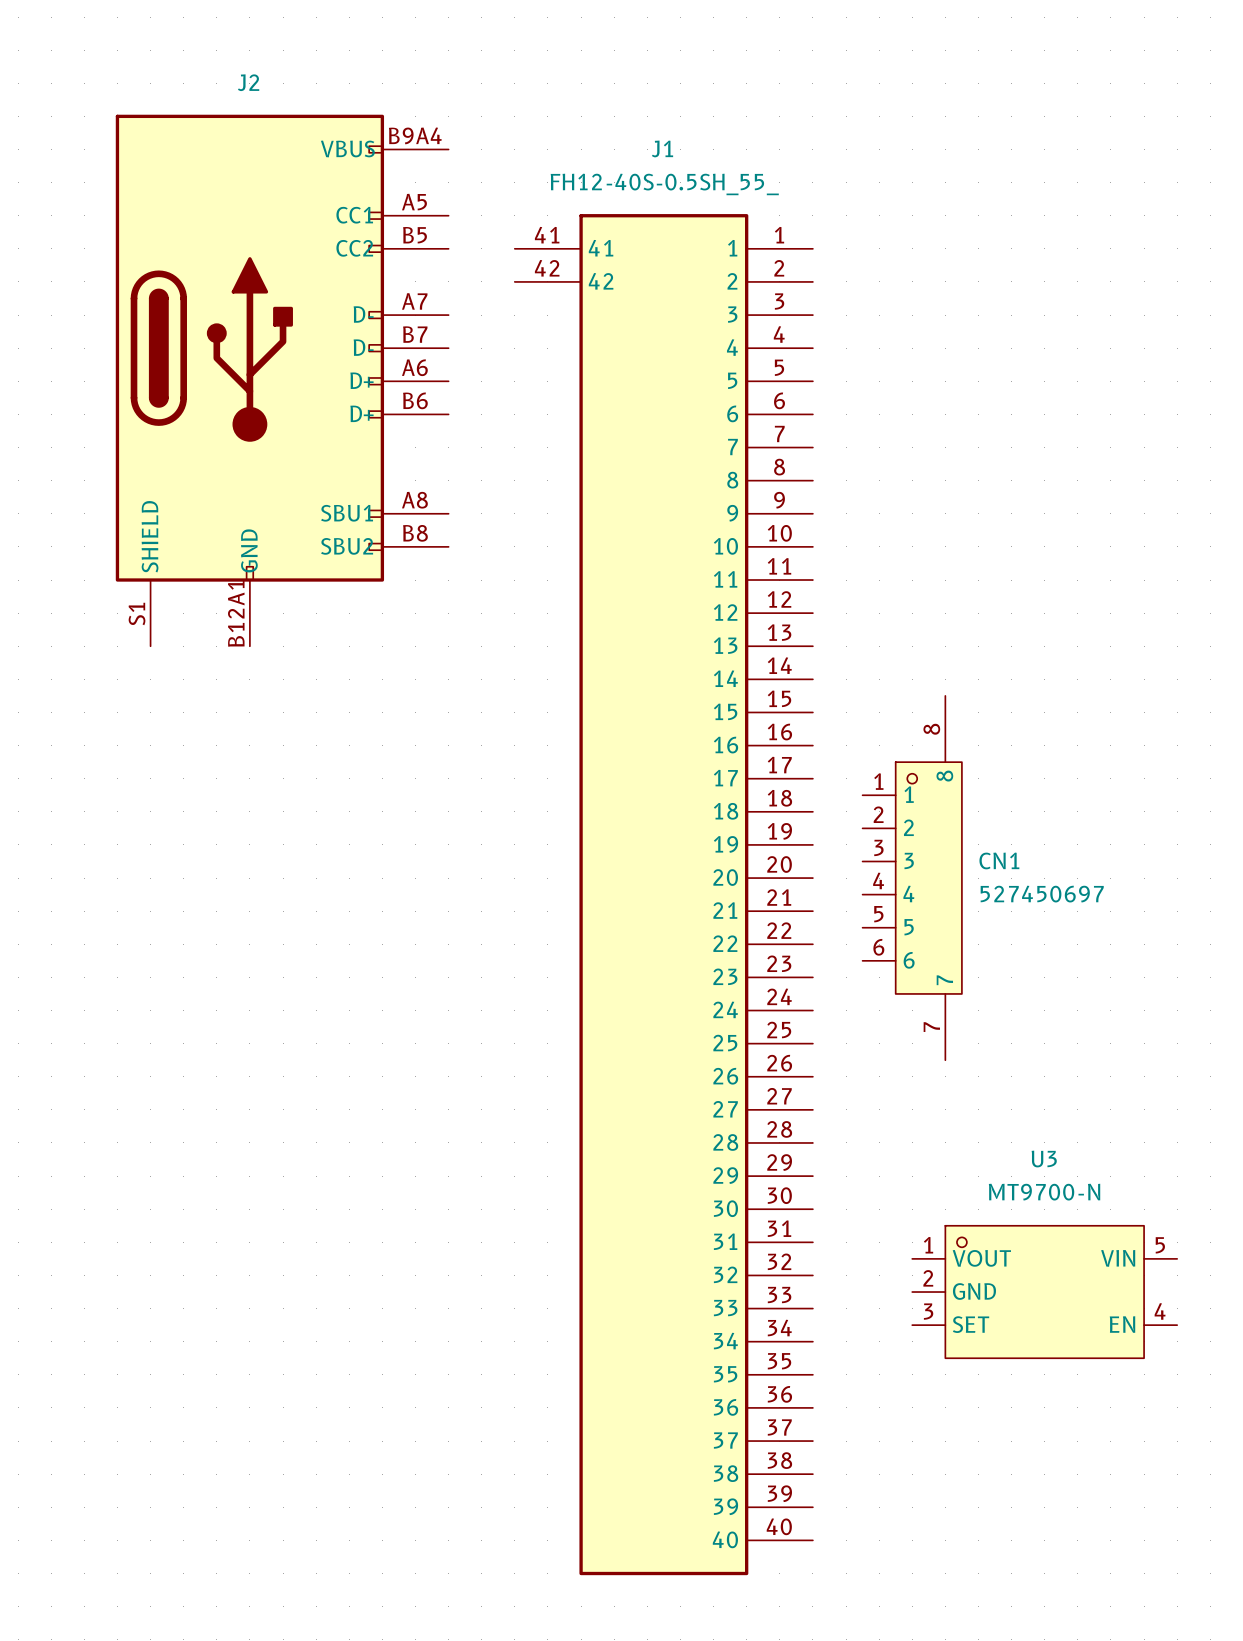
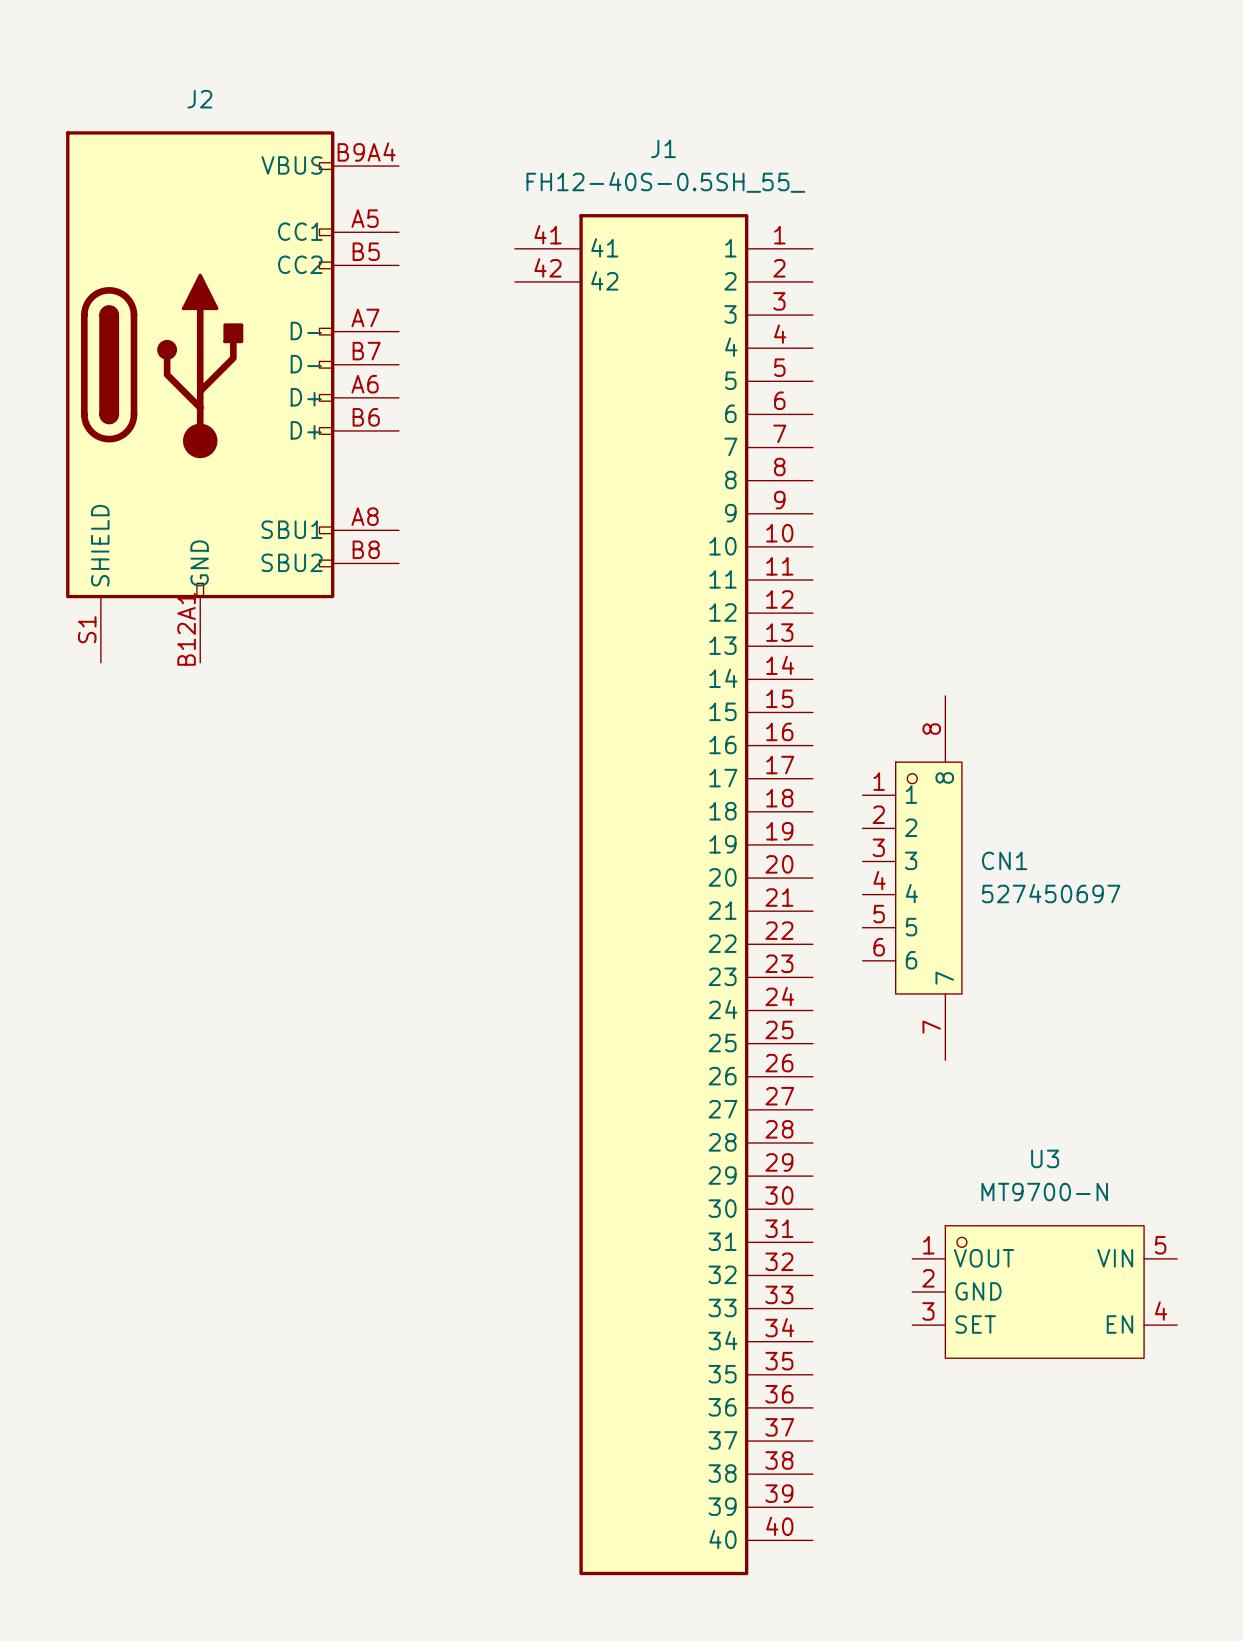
J2 position: (282, 380) -> (232, 397)

